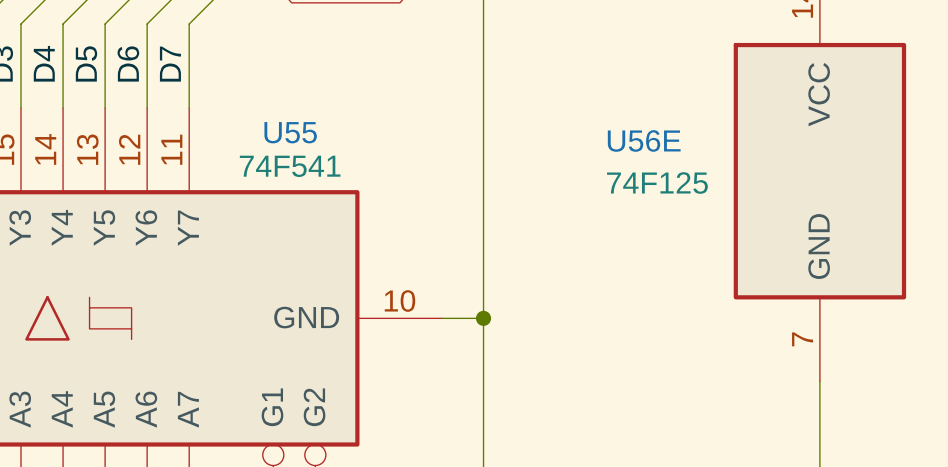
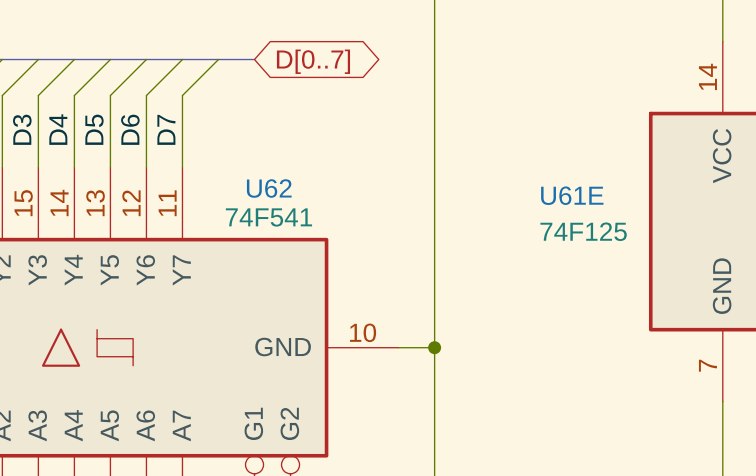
U55 name: U55 (290, 132) -> U62 (269, 188)
U56E name: U56E (644, 140) -> U61E (572, 195)

